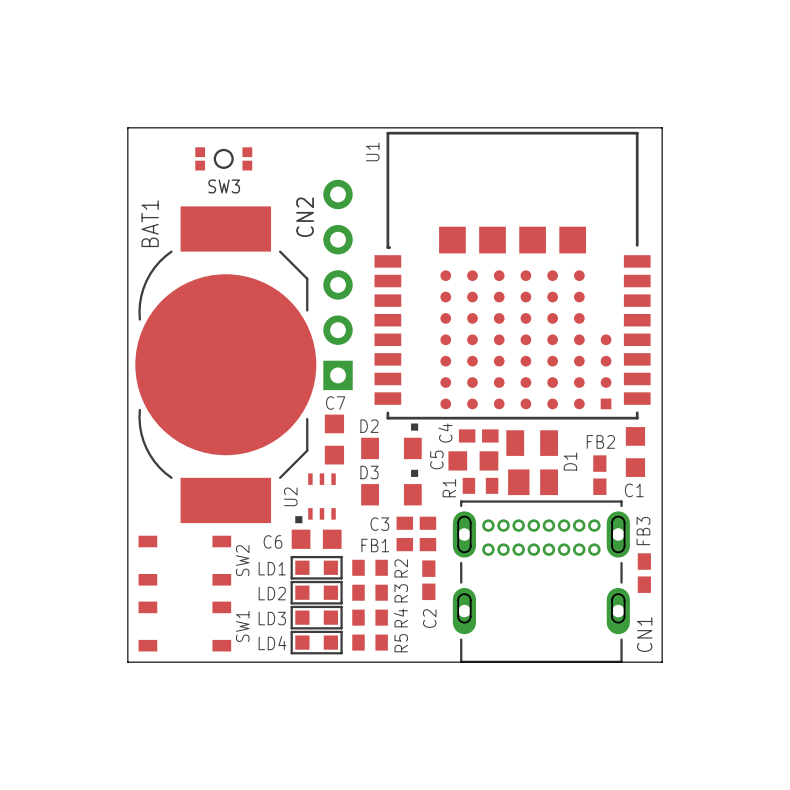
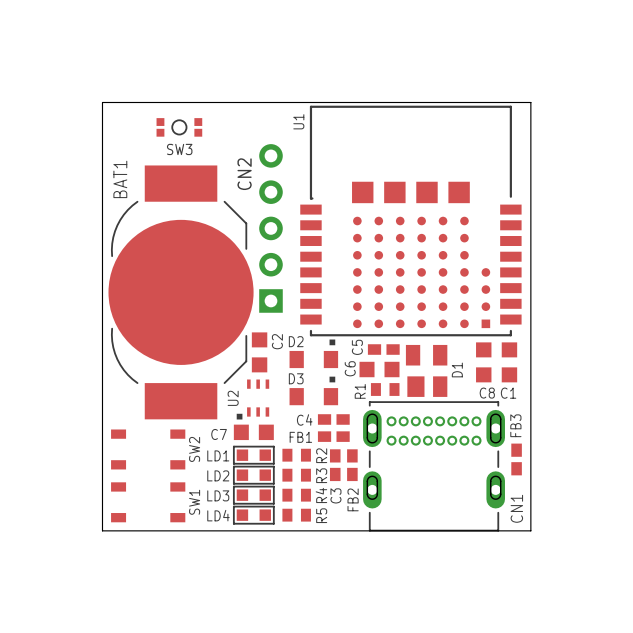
C4 name: C4 (445, 433) -> C5 (357, 347)
C7: (334, 439) -> none
FB2 name rotation: 0° (600, 441) -> 90° counterclockwise (353, 499)
FB2 name position: FB2 (600, 441) -> FB2 (353, 499)
C8: none -> (483, 362)
C5 name: C5 (436, 459) -> C6 (350, 368)
FB2 position: (599, 475) -> (352, 465)
C3 name: C3 (379, 524) -> C4 (304, 419)
C6 name: C6 (272, 541) -> C7 (219, 434)
C2 footprint: [422, 560, 436, 601] -> [251, 332, 268, 373]
C3: none -> (335, 465)
C2 name position: C2 (429, 618) -> C2 (277, 341)

